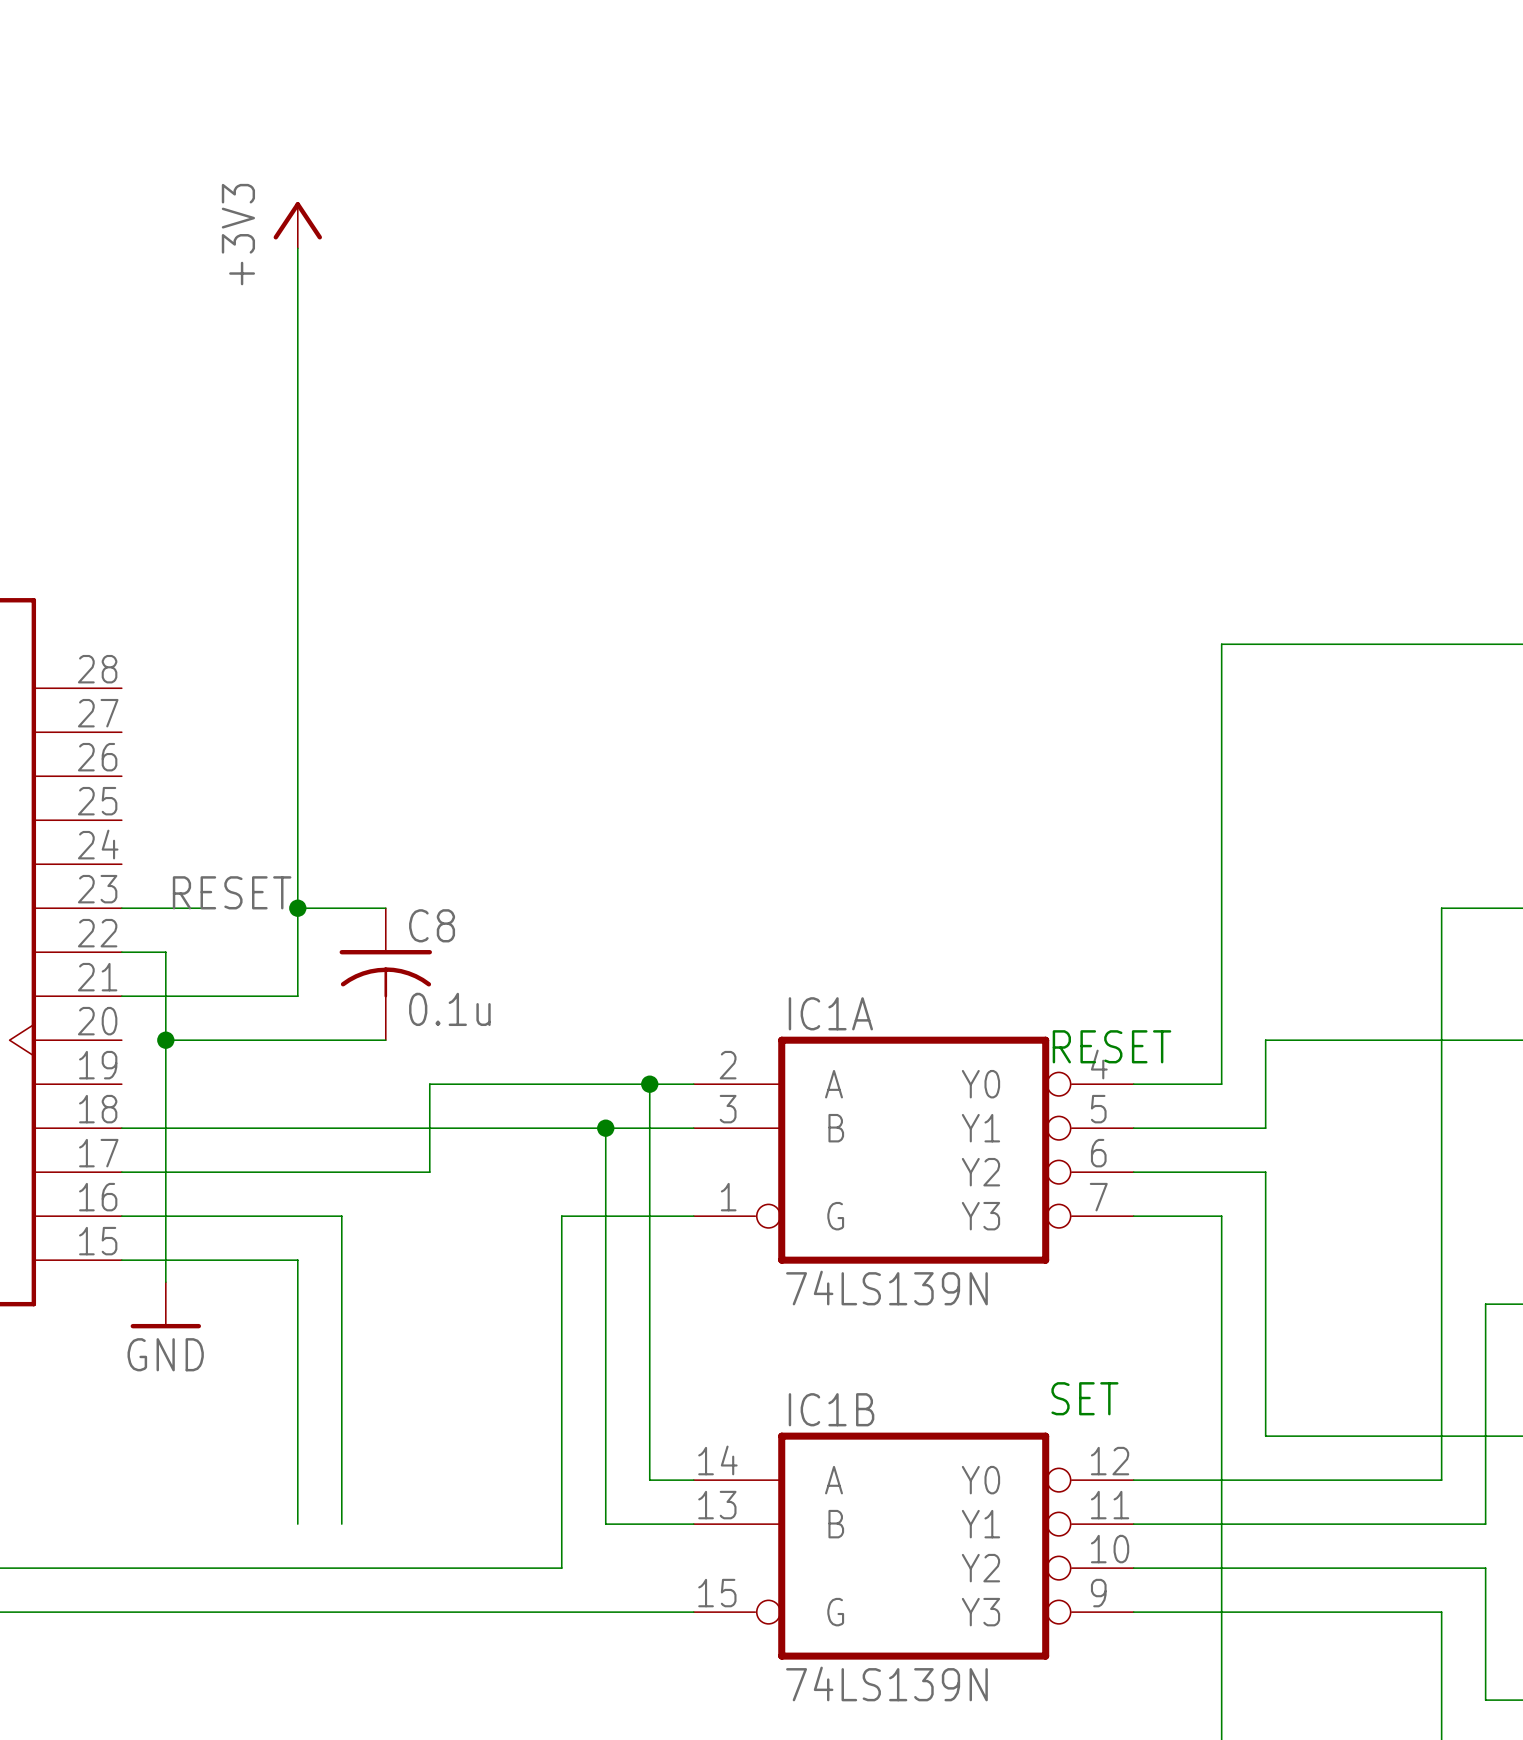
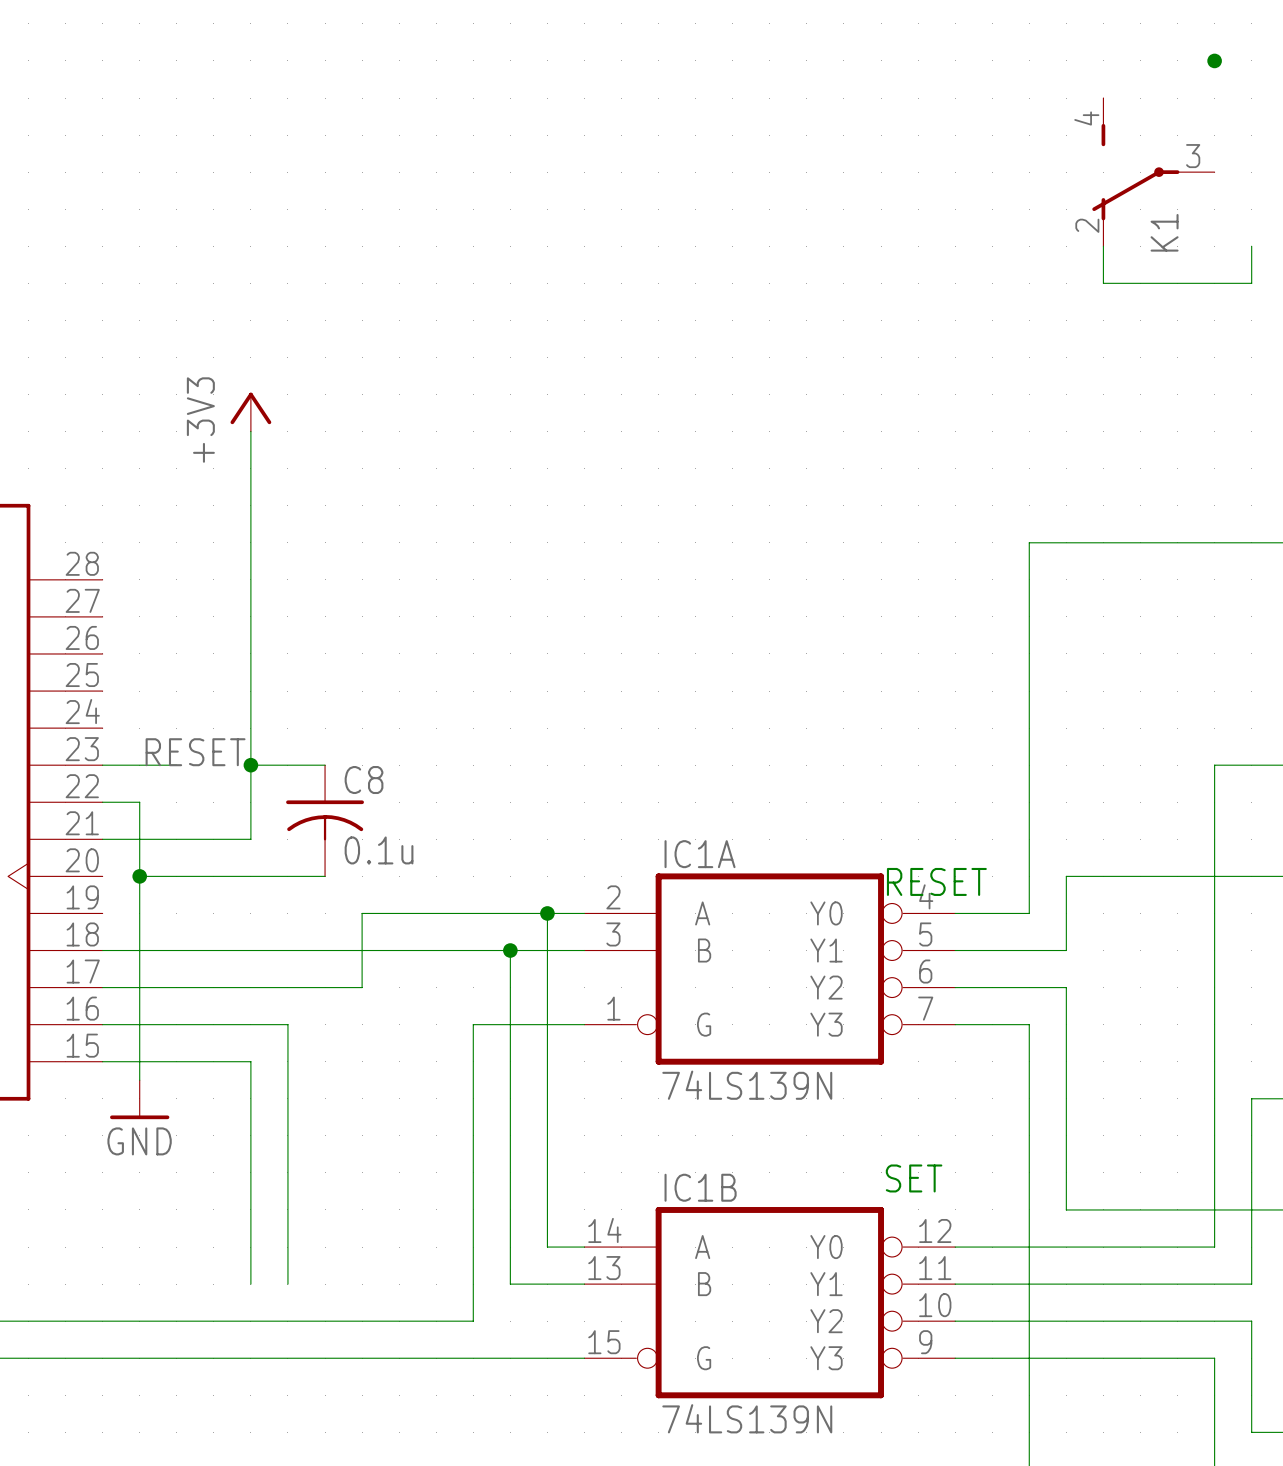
junction: none -> (1214, 60)
K1: none -> (1153, 172)
power symbol position: +3V3 (297, 225) -> +3V3 (250, 412)
wire: (297, 248) (297, 512) -> none
wire: none -> (1103, 246) (1103, 283) (1251, 283) (1251, 246)

